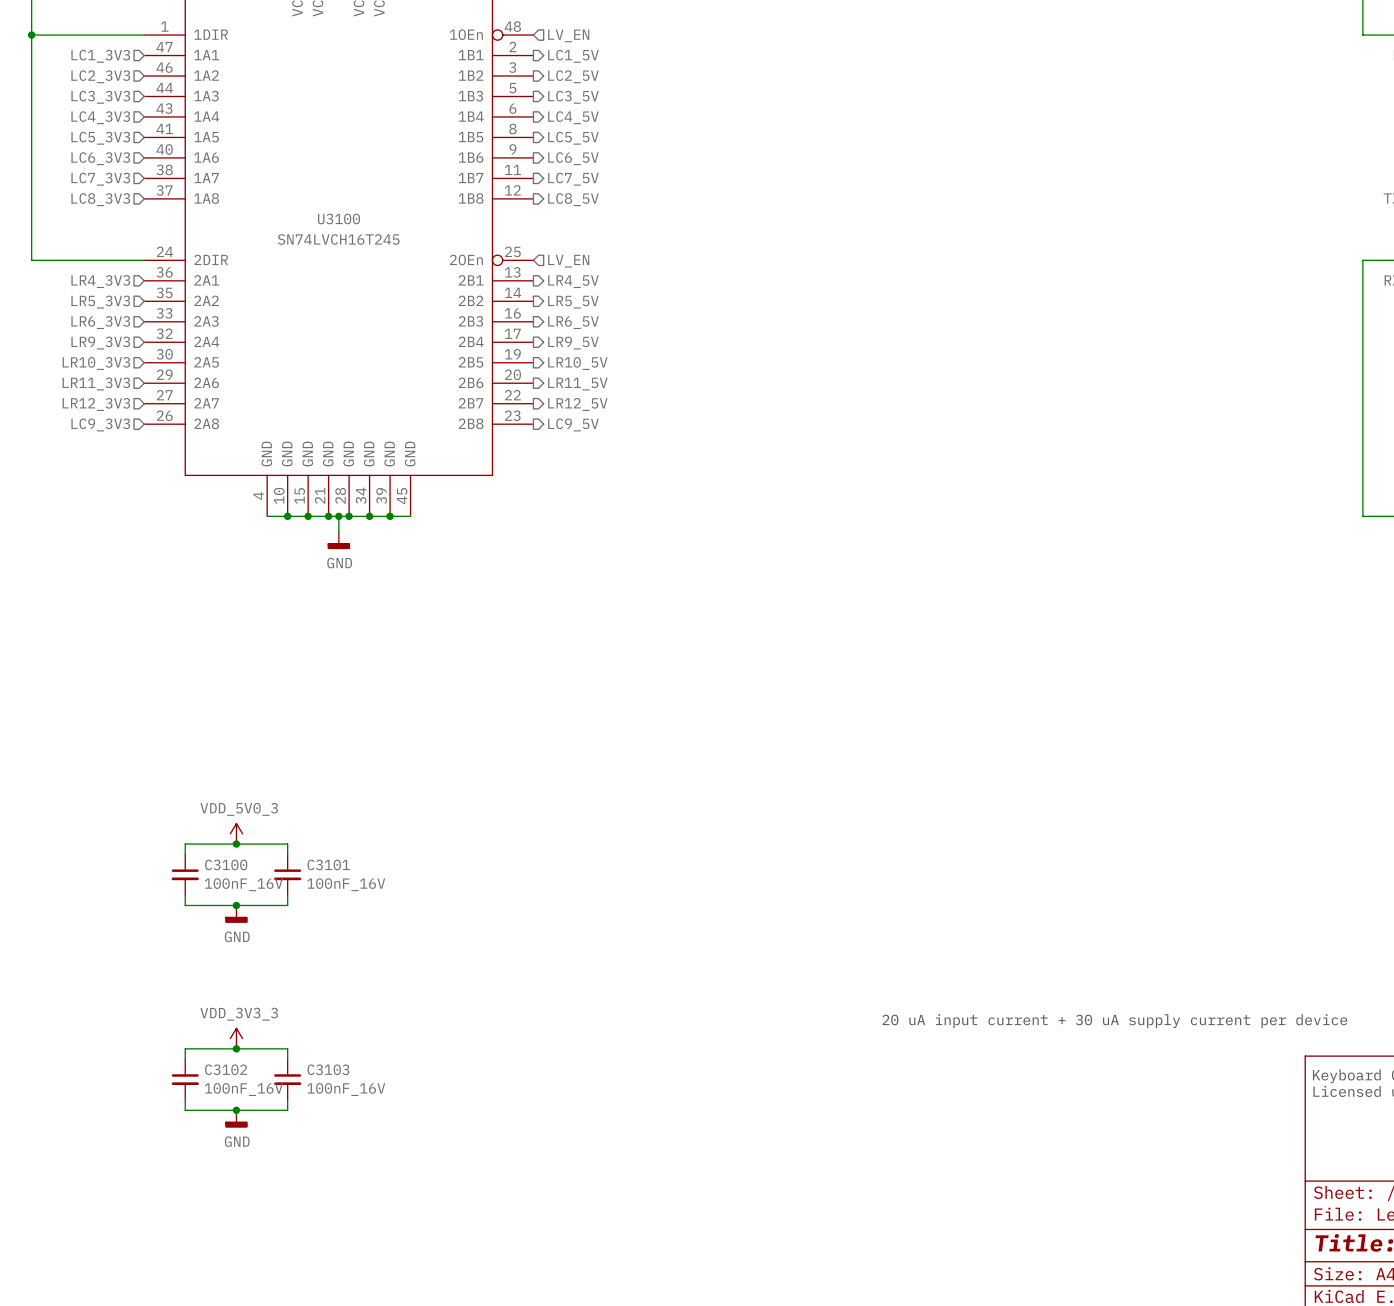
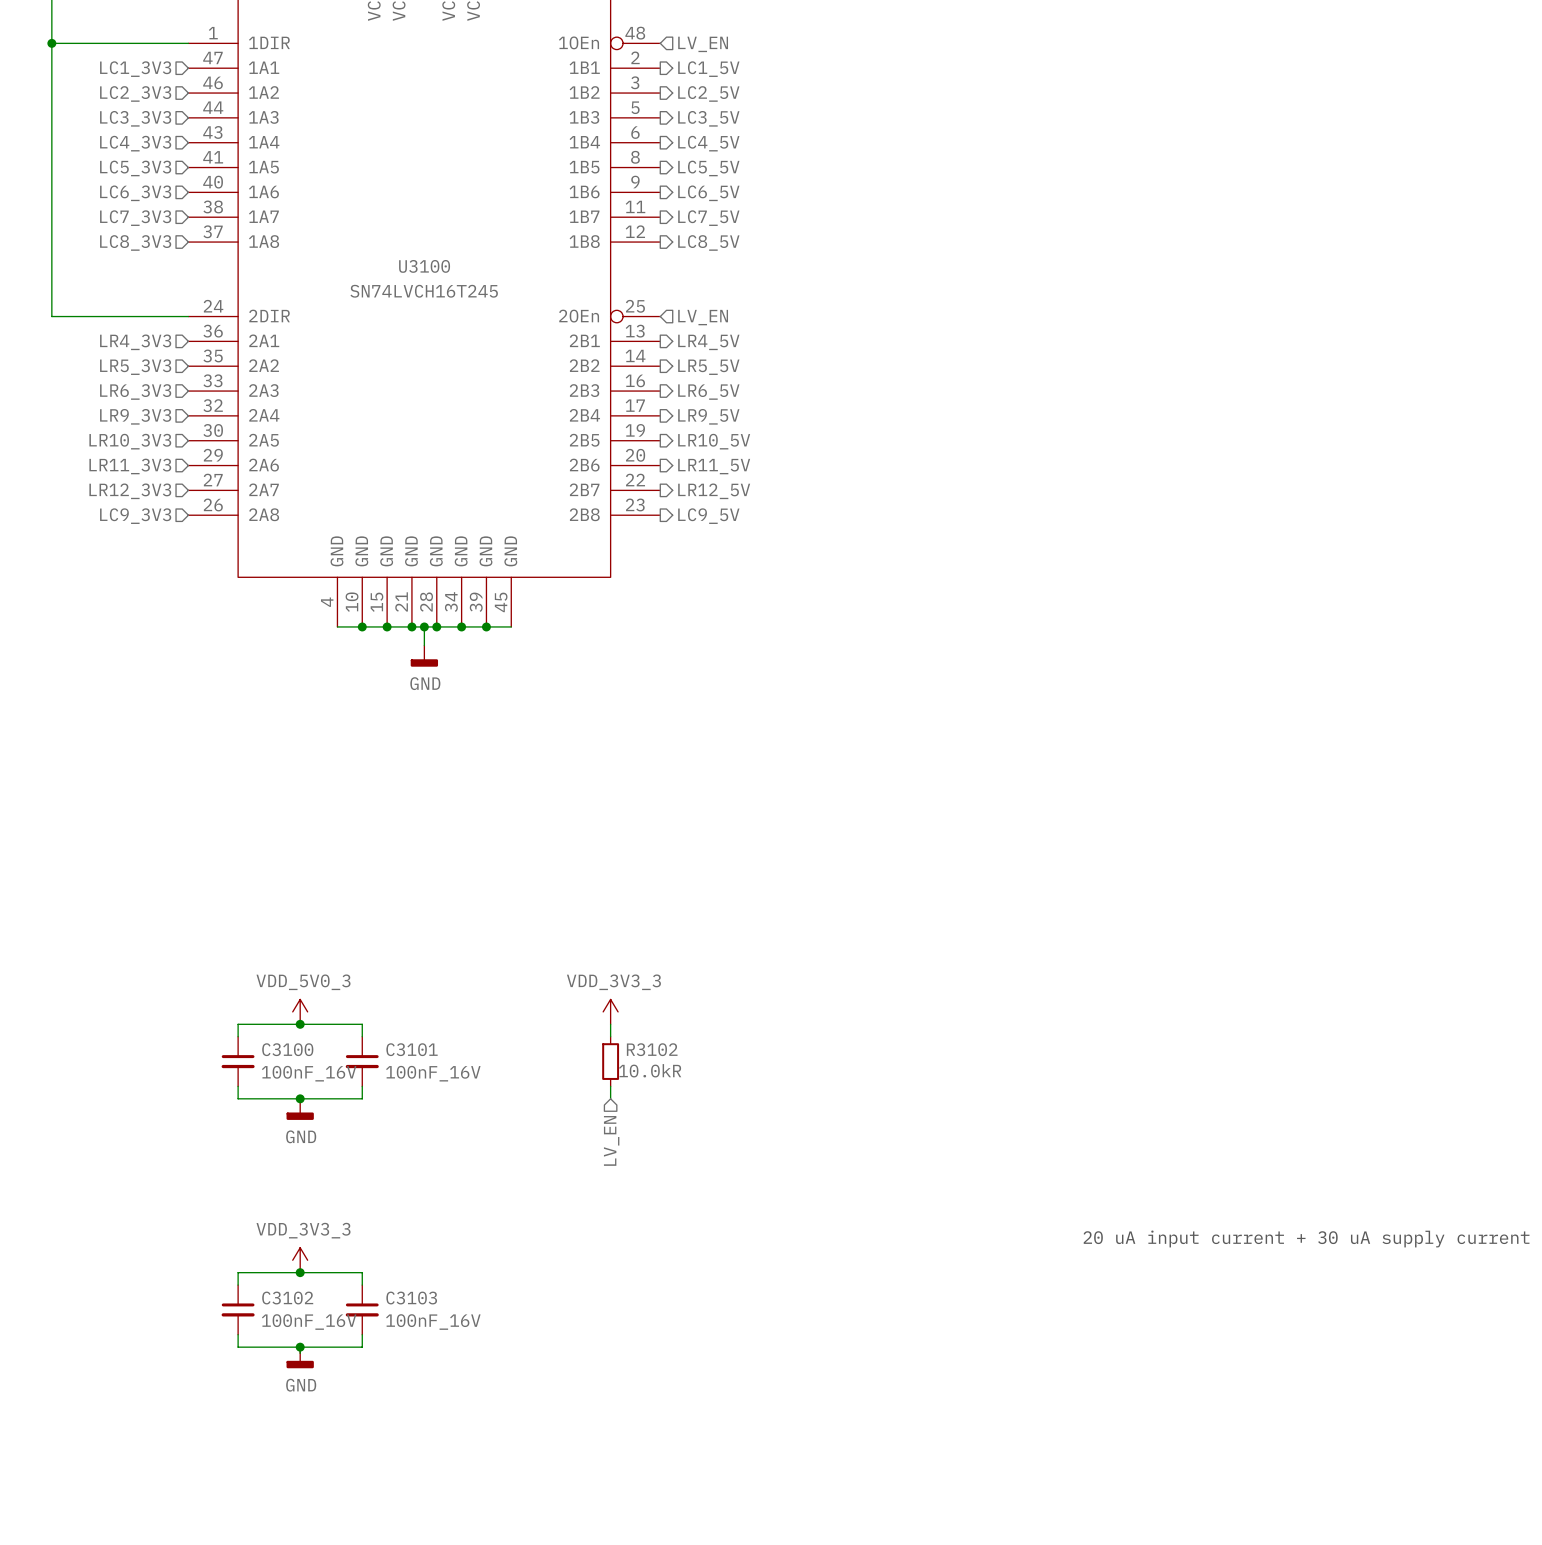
power symbol: none -> VDD_3V3_3 (610, 1011)
wire: none -> (610, 1024) (610, 1036)
R3102: none -> 10.0kR (610, 1061)
wire: none -> (610, 1086) (610, 1098)
hierarchical label: none -> LV_EN (611, 1140)

